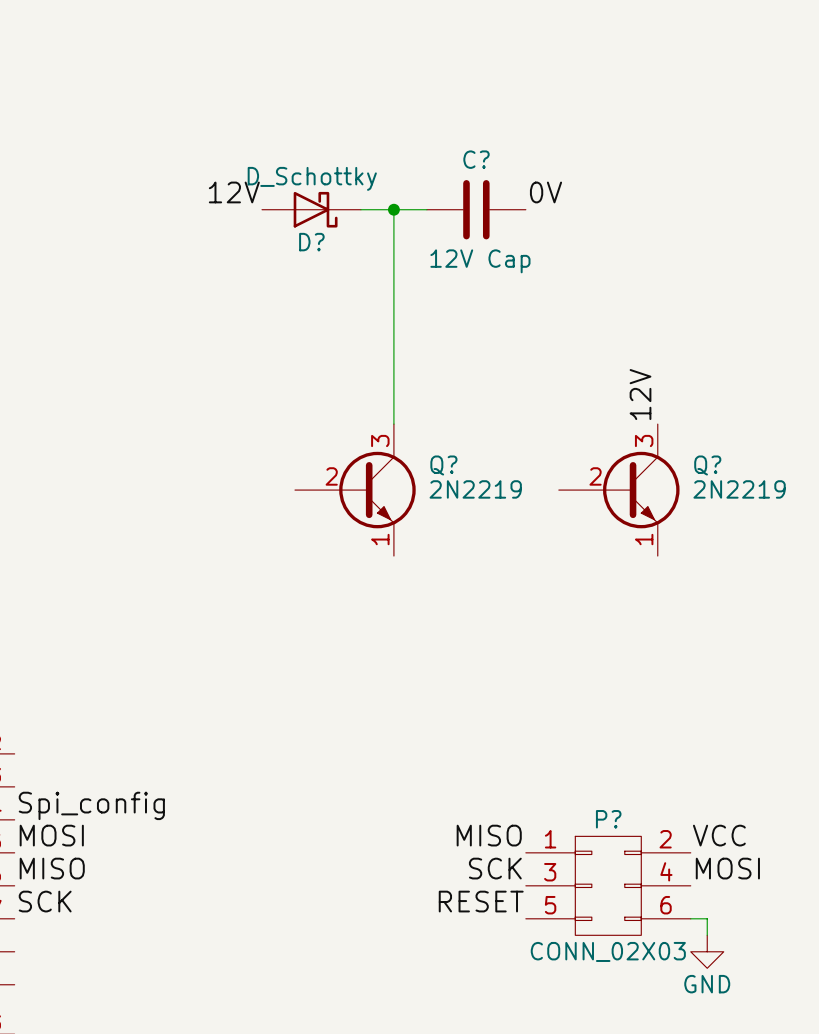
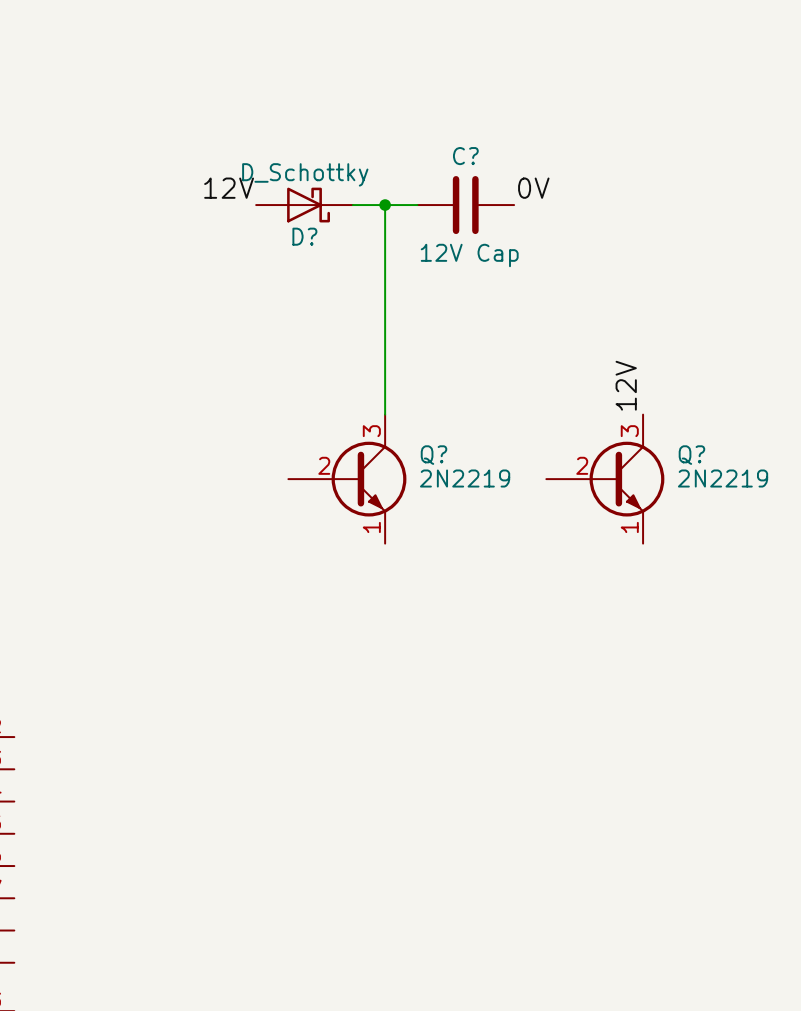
label: Spi_config (91, 805) -> none
label: MOSI (51, 835) -> none
label: MISO (489, 835) -> none
label: VCC (719, 835) -> none
label: MISO (52, 868) -> none
label: SCK (495, 868) -> none
label: MOSI (727, 868) -> none
P?: CONN_02X03 (608, 885) -> none
label: SCK (45, 901) -> none
label: RESET (481, 901) -> none
wire: (690, 918) (707, 918) (707, 935) -> none
power symbol: GND (707, 951) -> none

